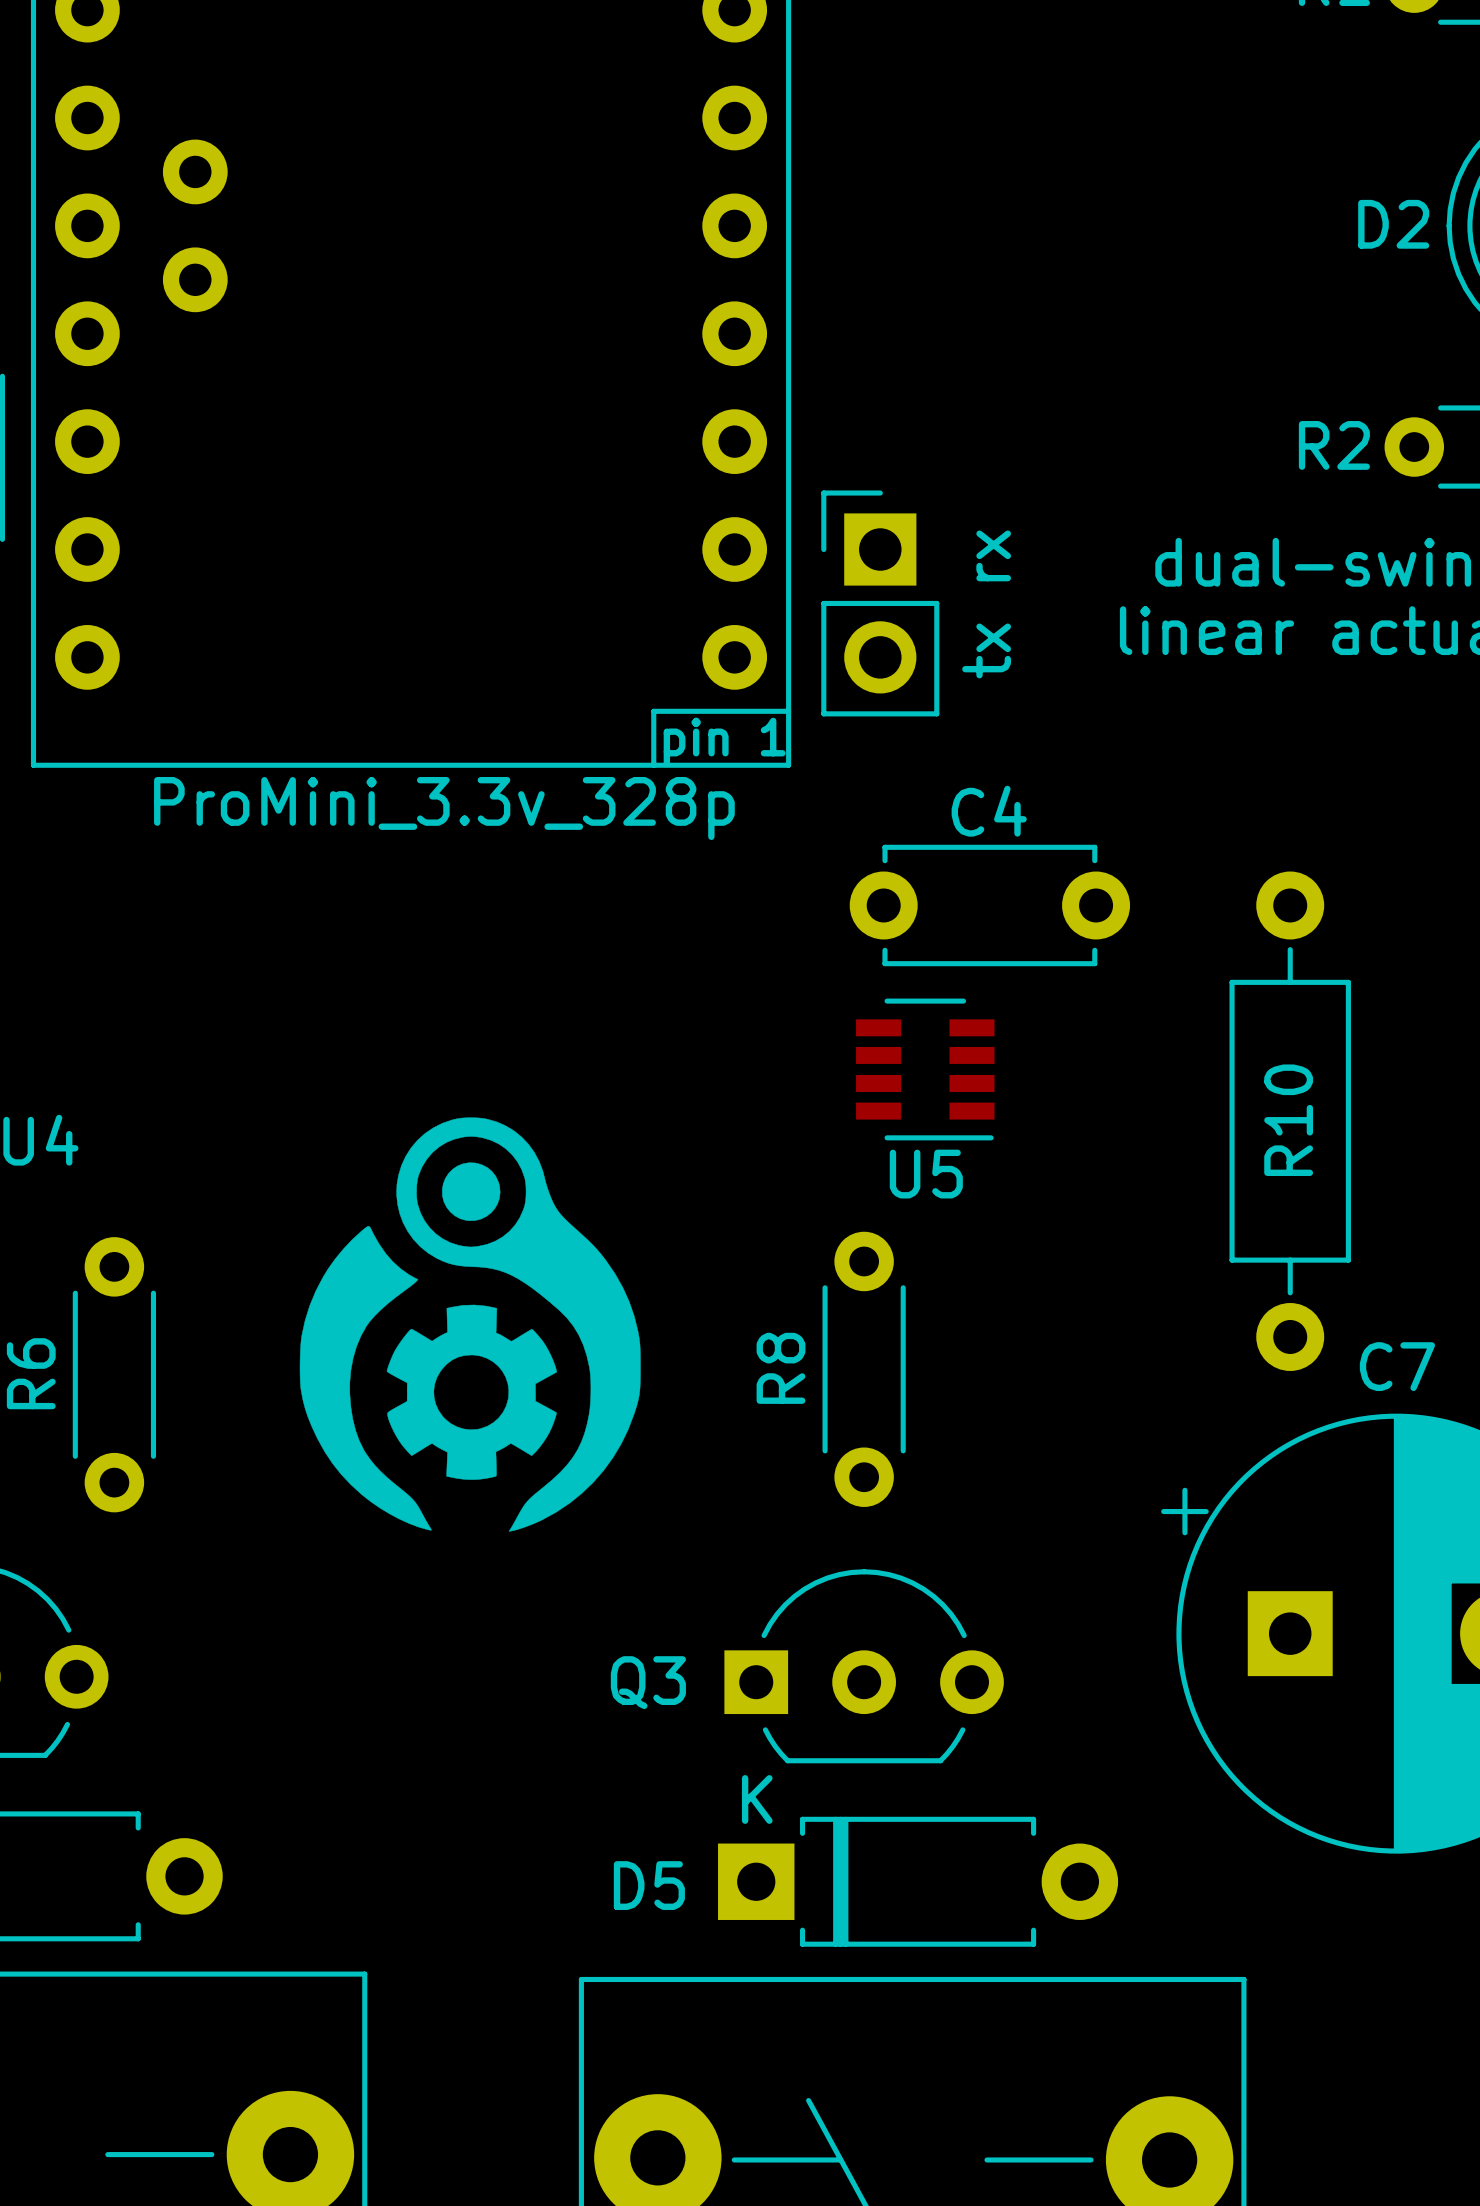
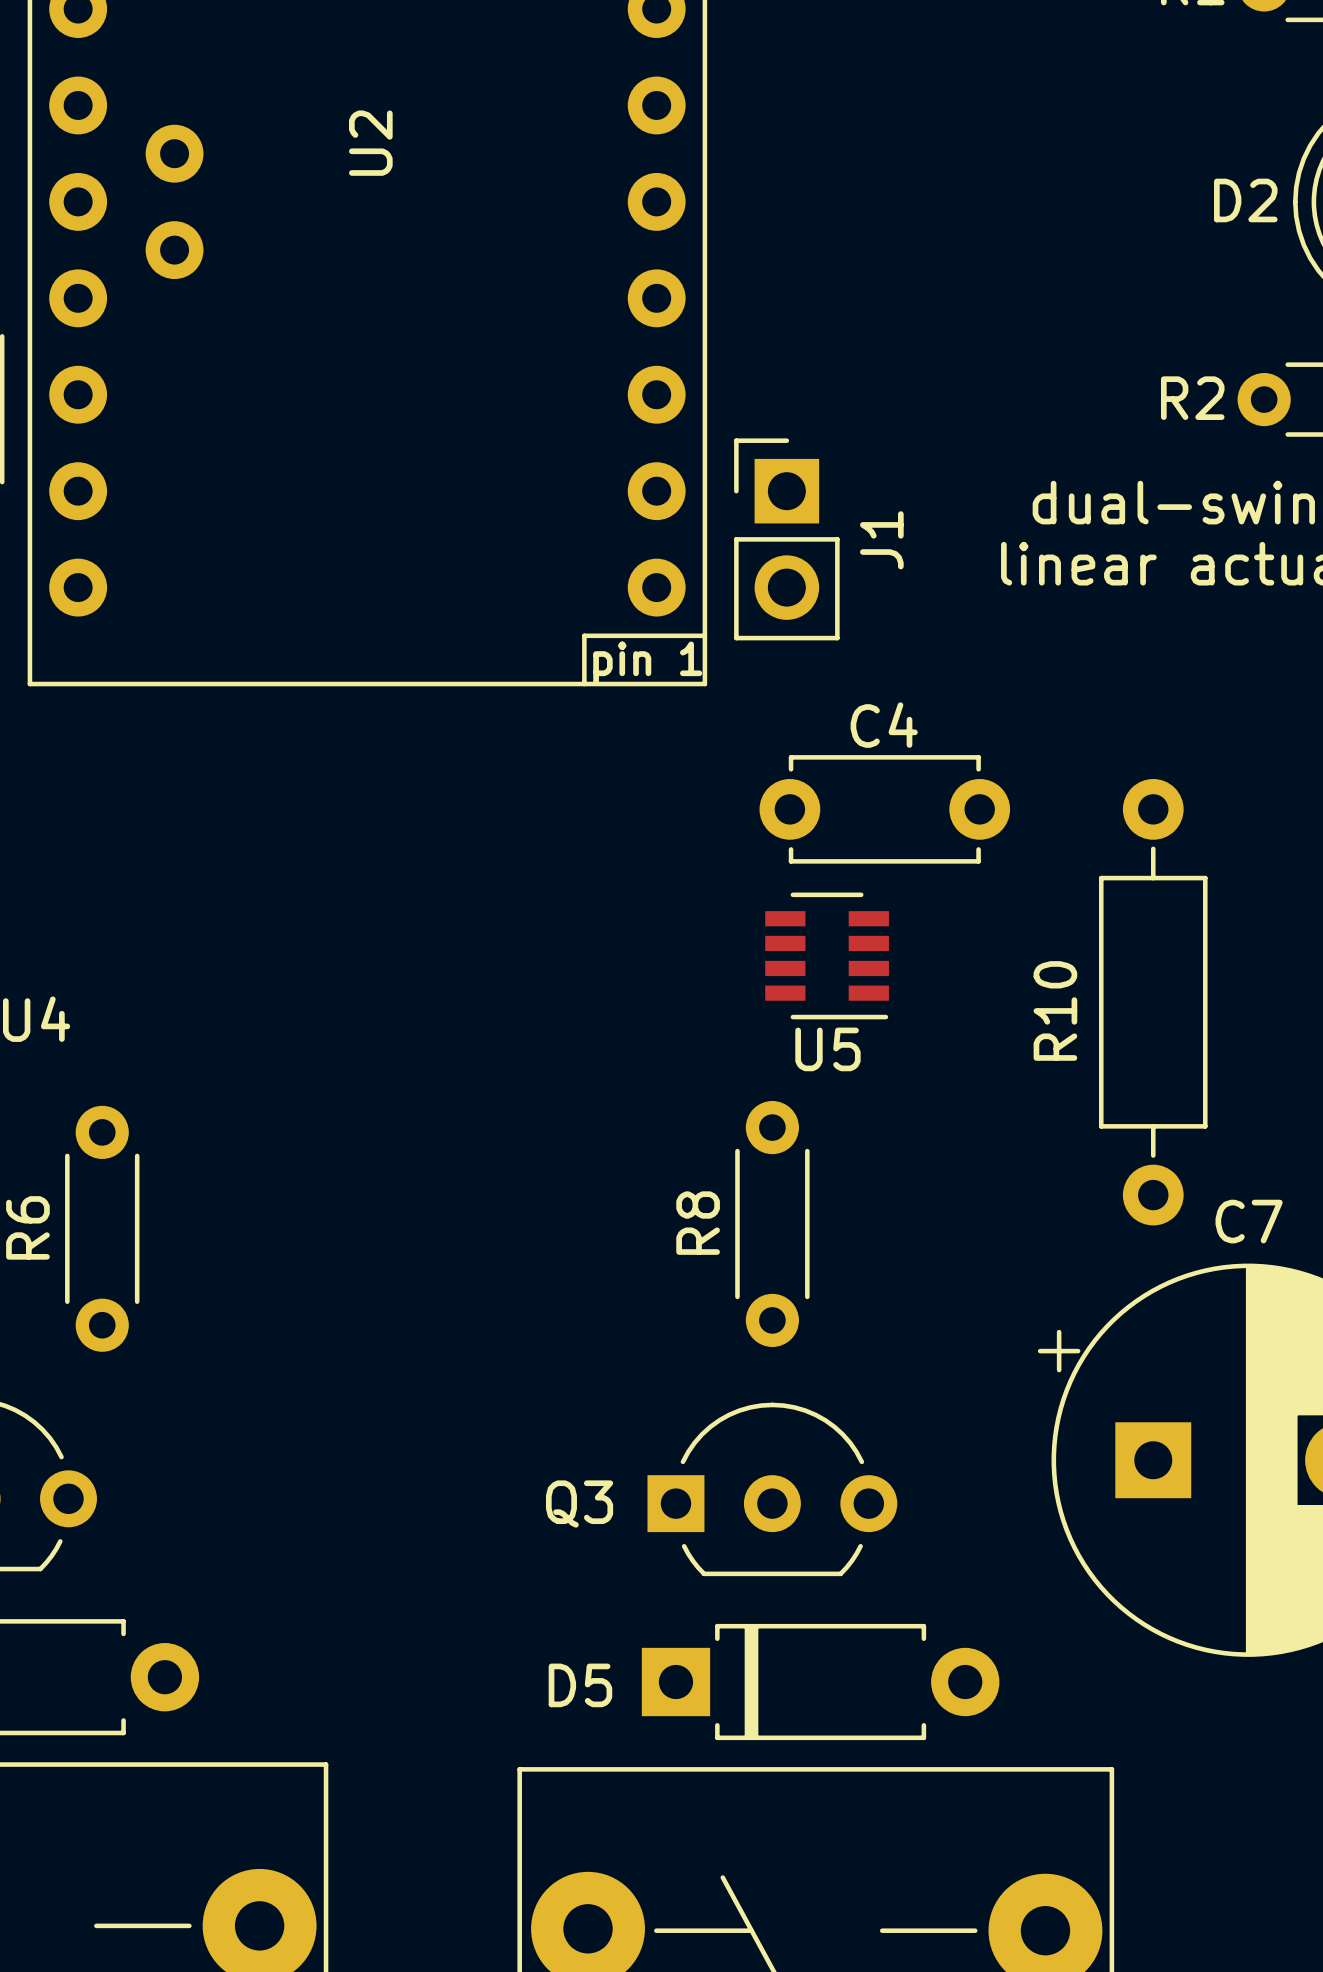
tx rx name: tx rx (986, 604) -> J1 (881, 540)
ProMini_3.3v_328p name: ProMini_3.3v_328p (444, 808) -> U2 (370, 143)
drawing: [299, 1117, 641, 1532] -> none
R10 name position: R10 (1288, 1120) -> R10 (1055, 1010)
D5 text: K (757, 1799) -> none

